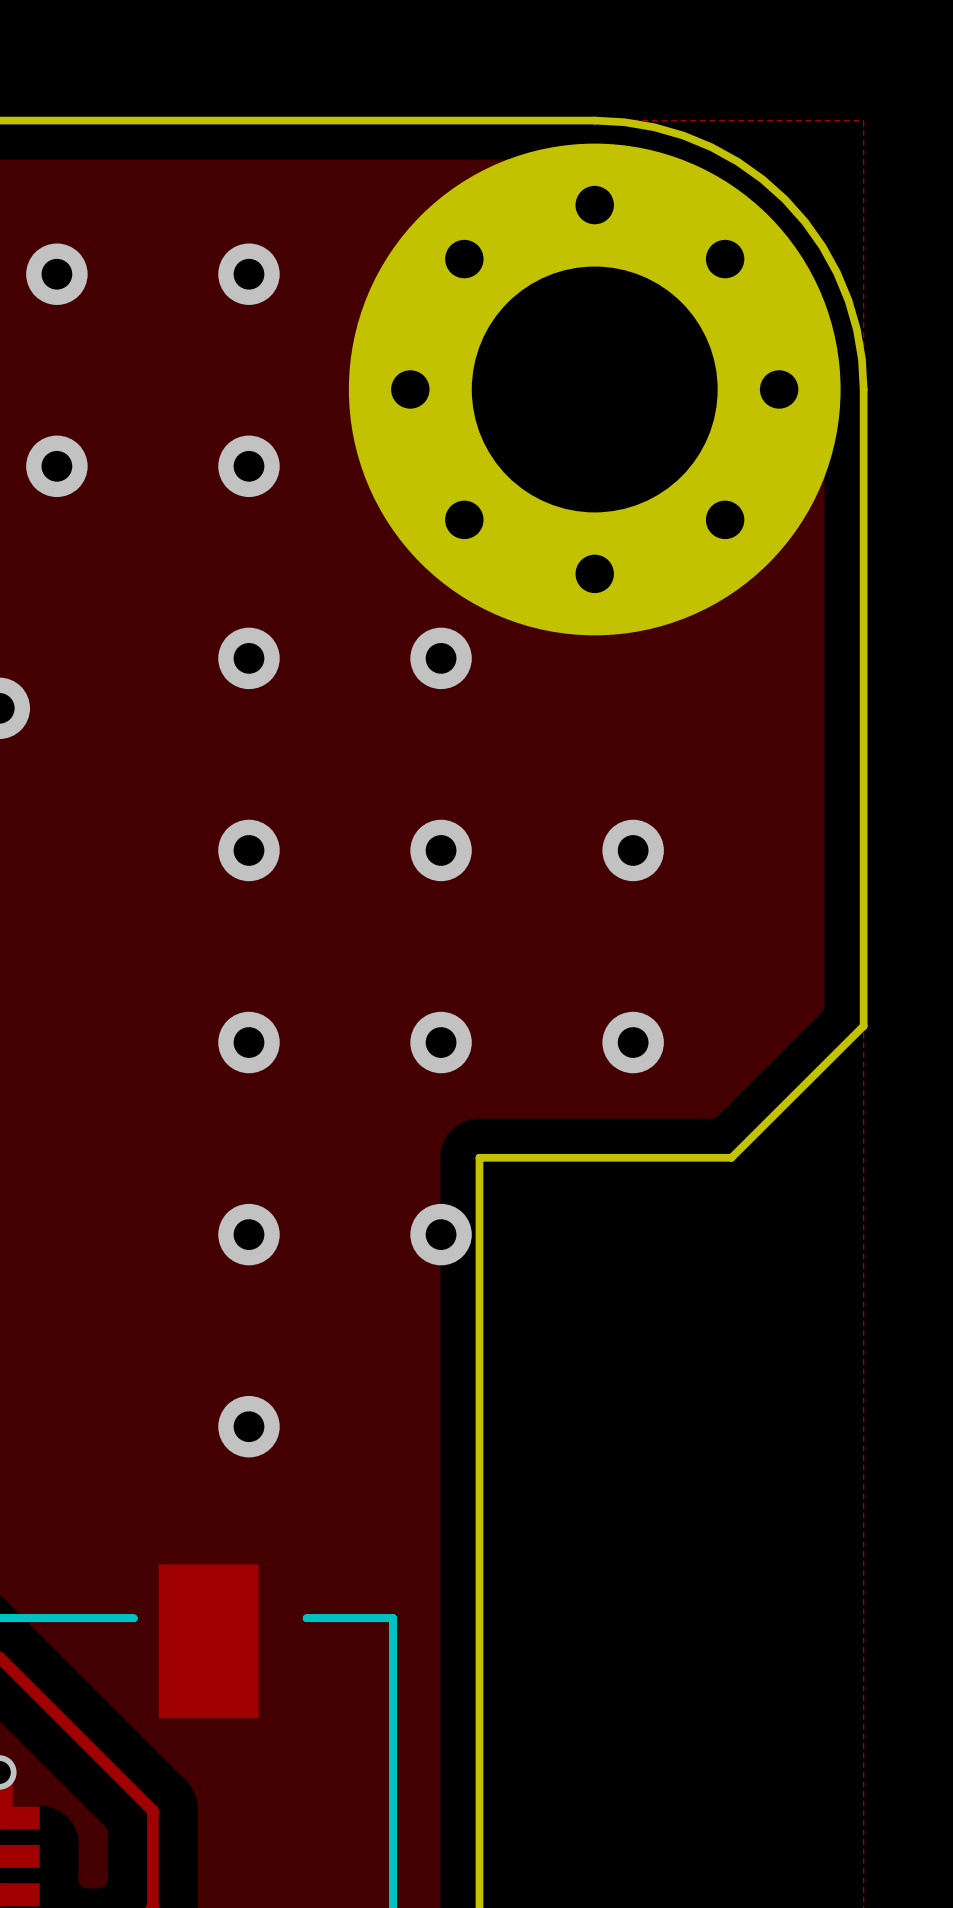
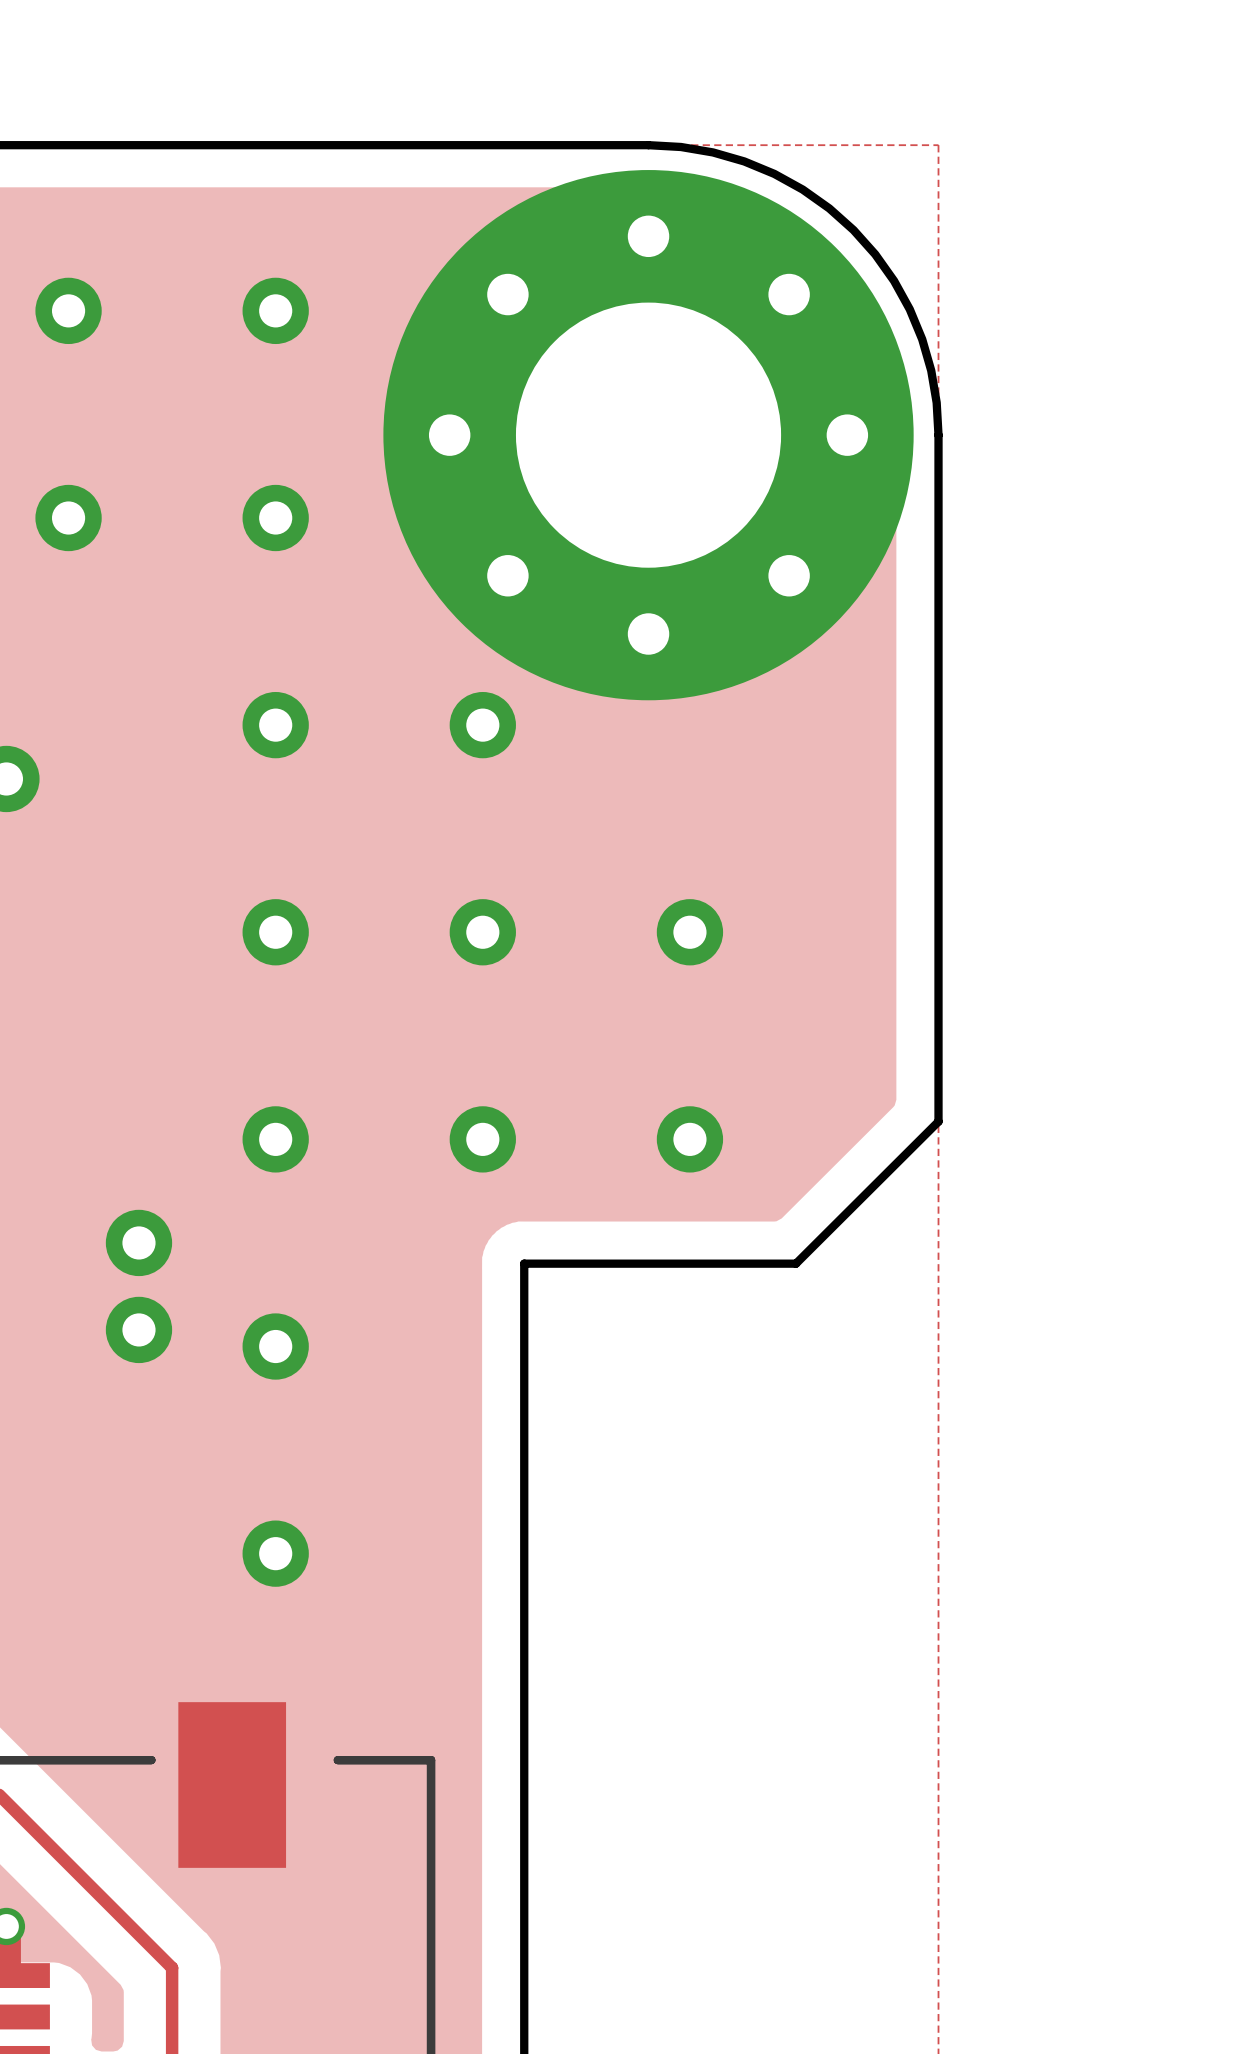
via: none -> (138, 1242)
via: none -> (138, 1329)
via: (441, 1234) -> none

